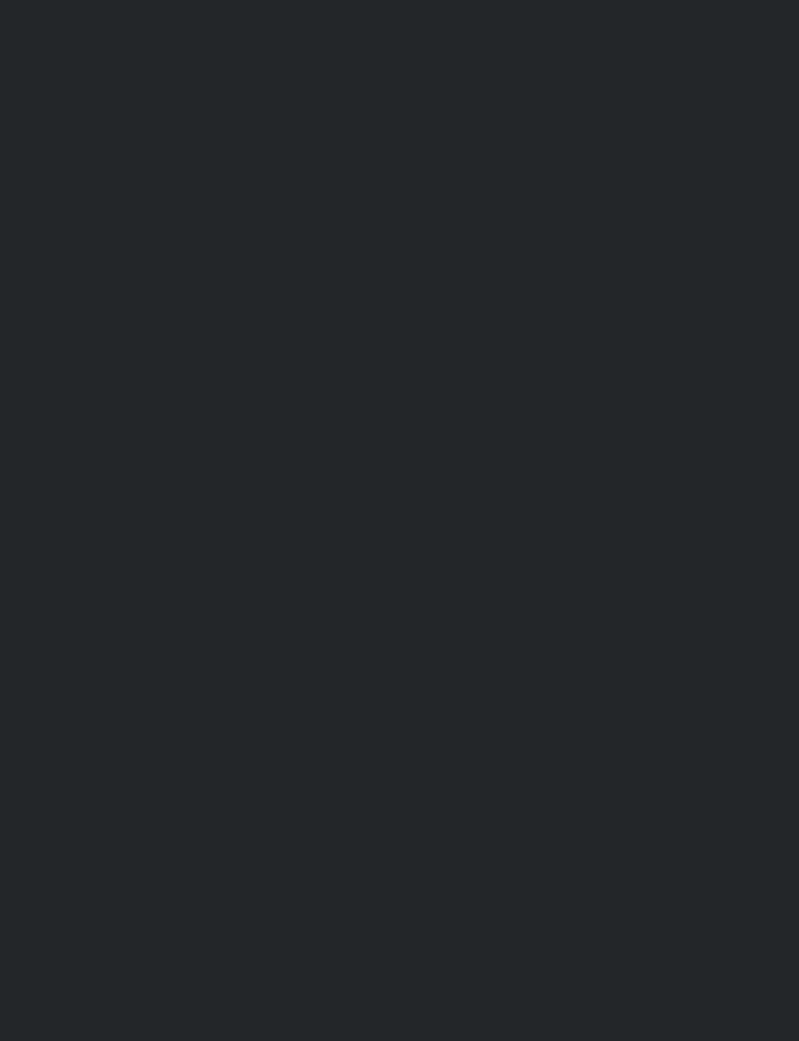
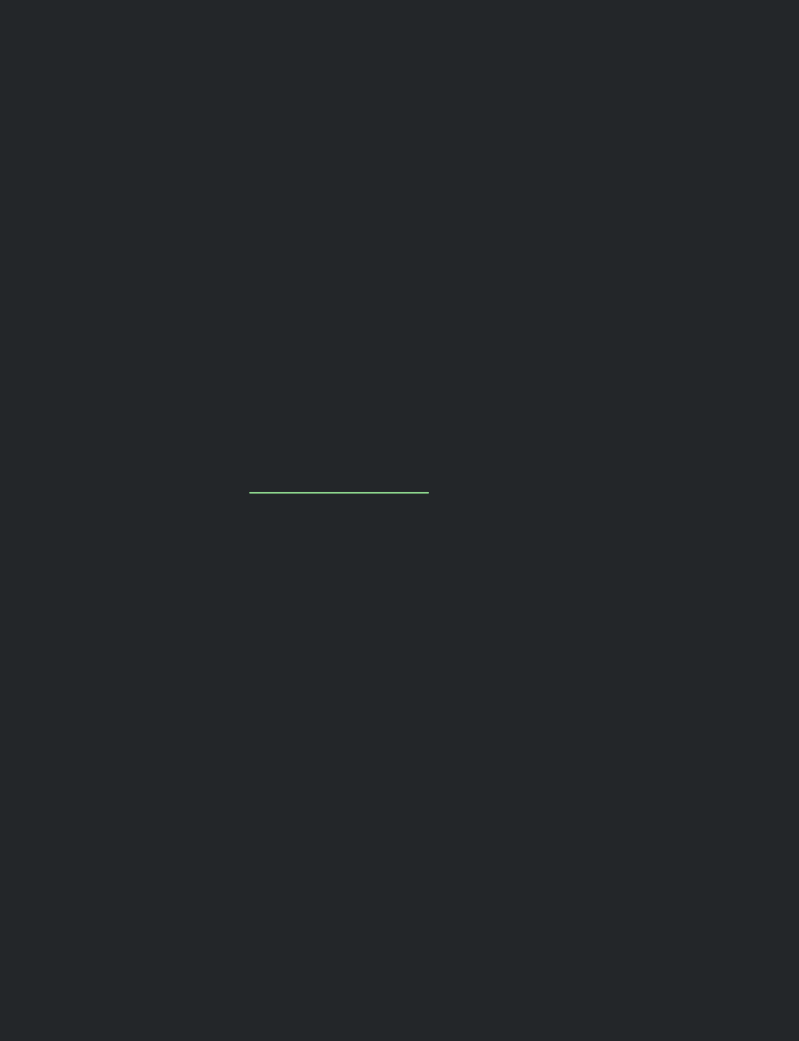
wire: none -> (249, 492) (428, 492)

